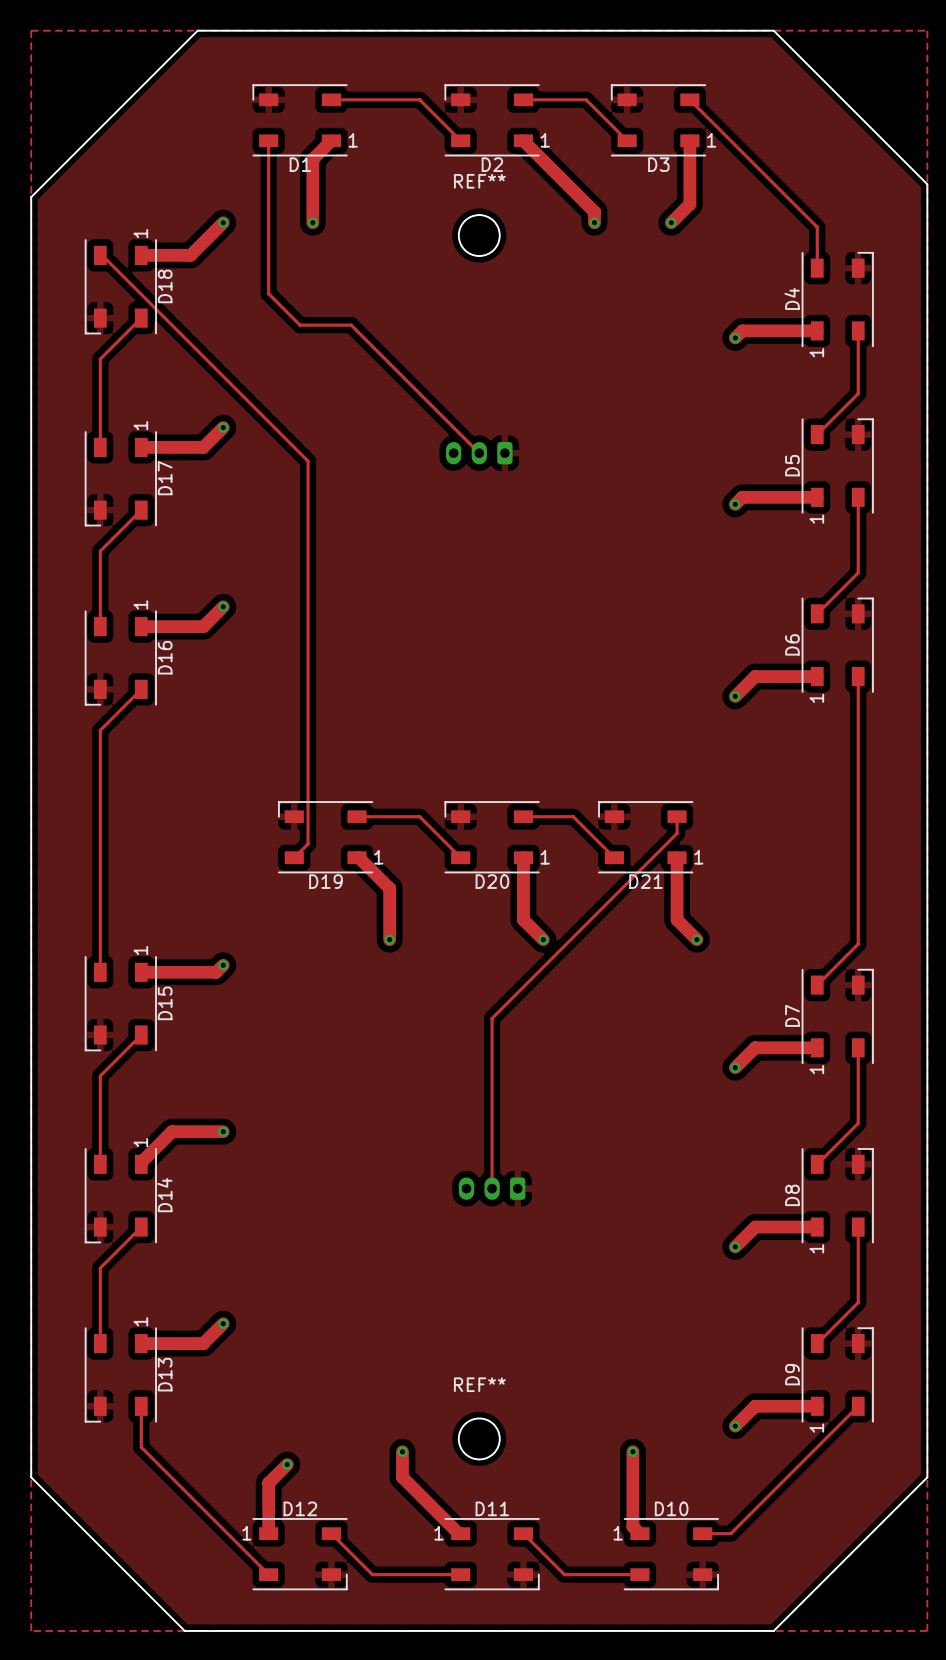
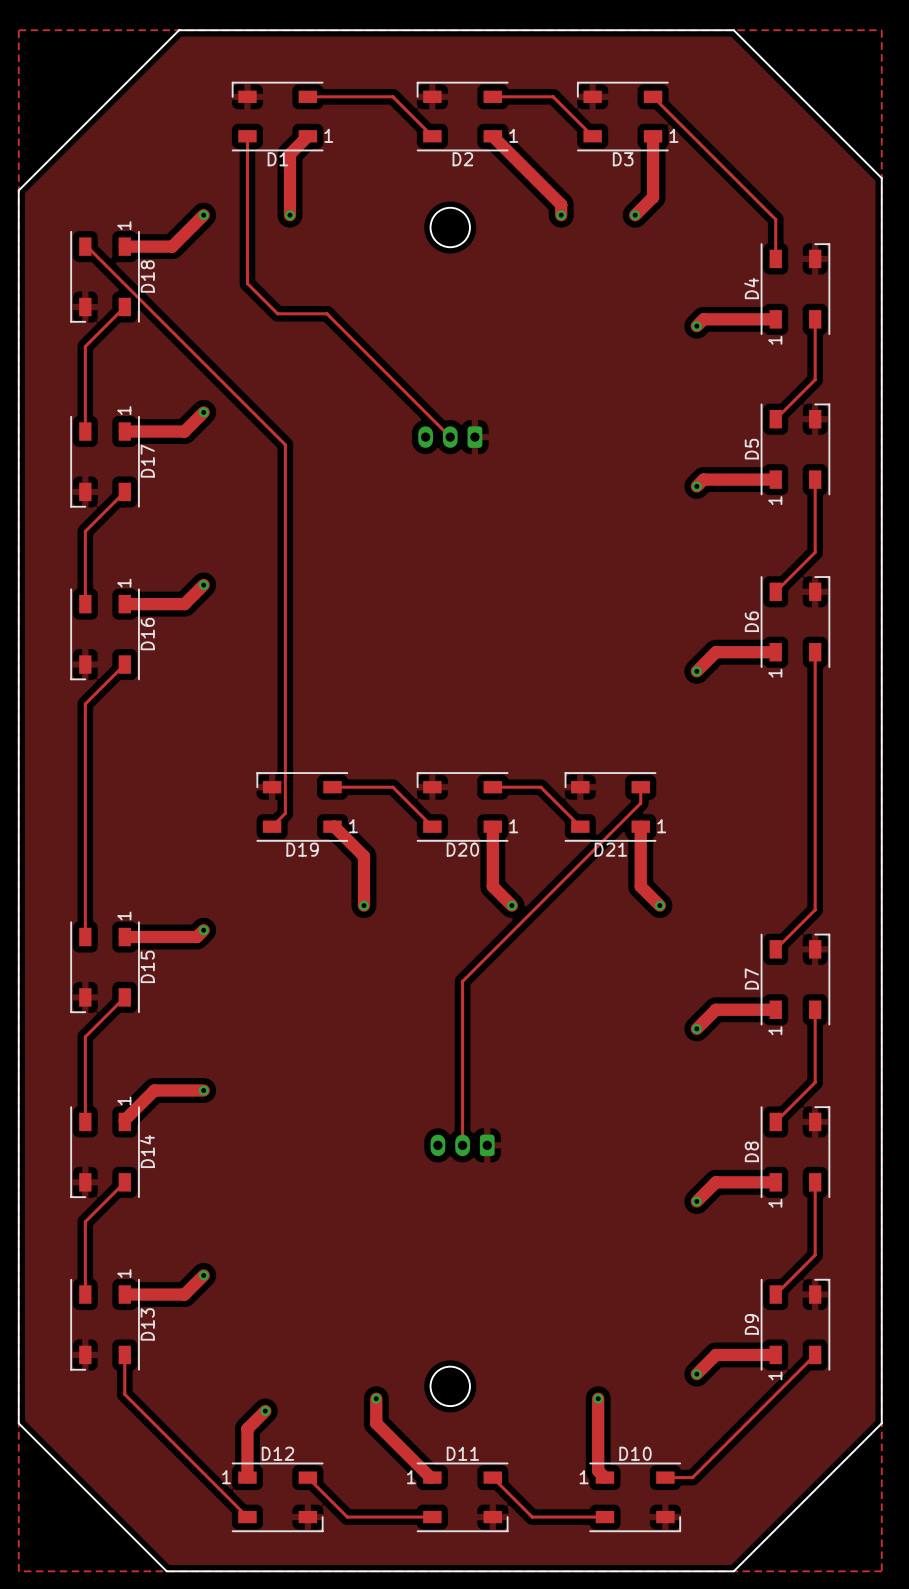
REF** name: REF** (479, 181) -> none
REF** name: REF** (479, 1384) -> none

